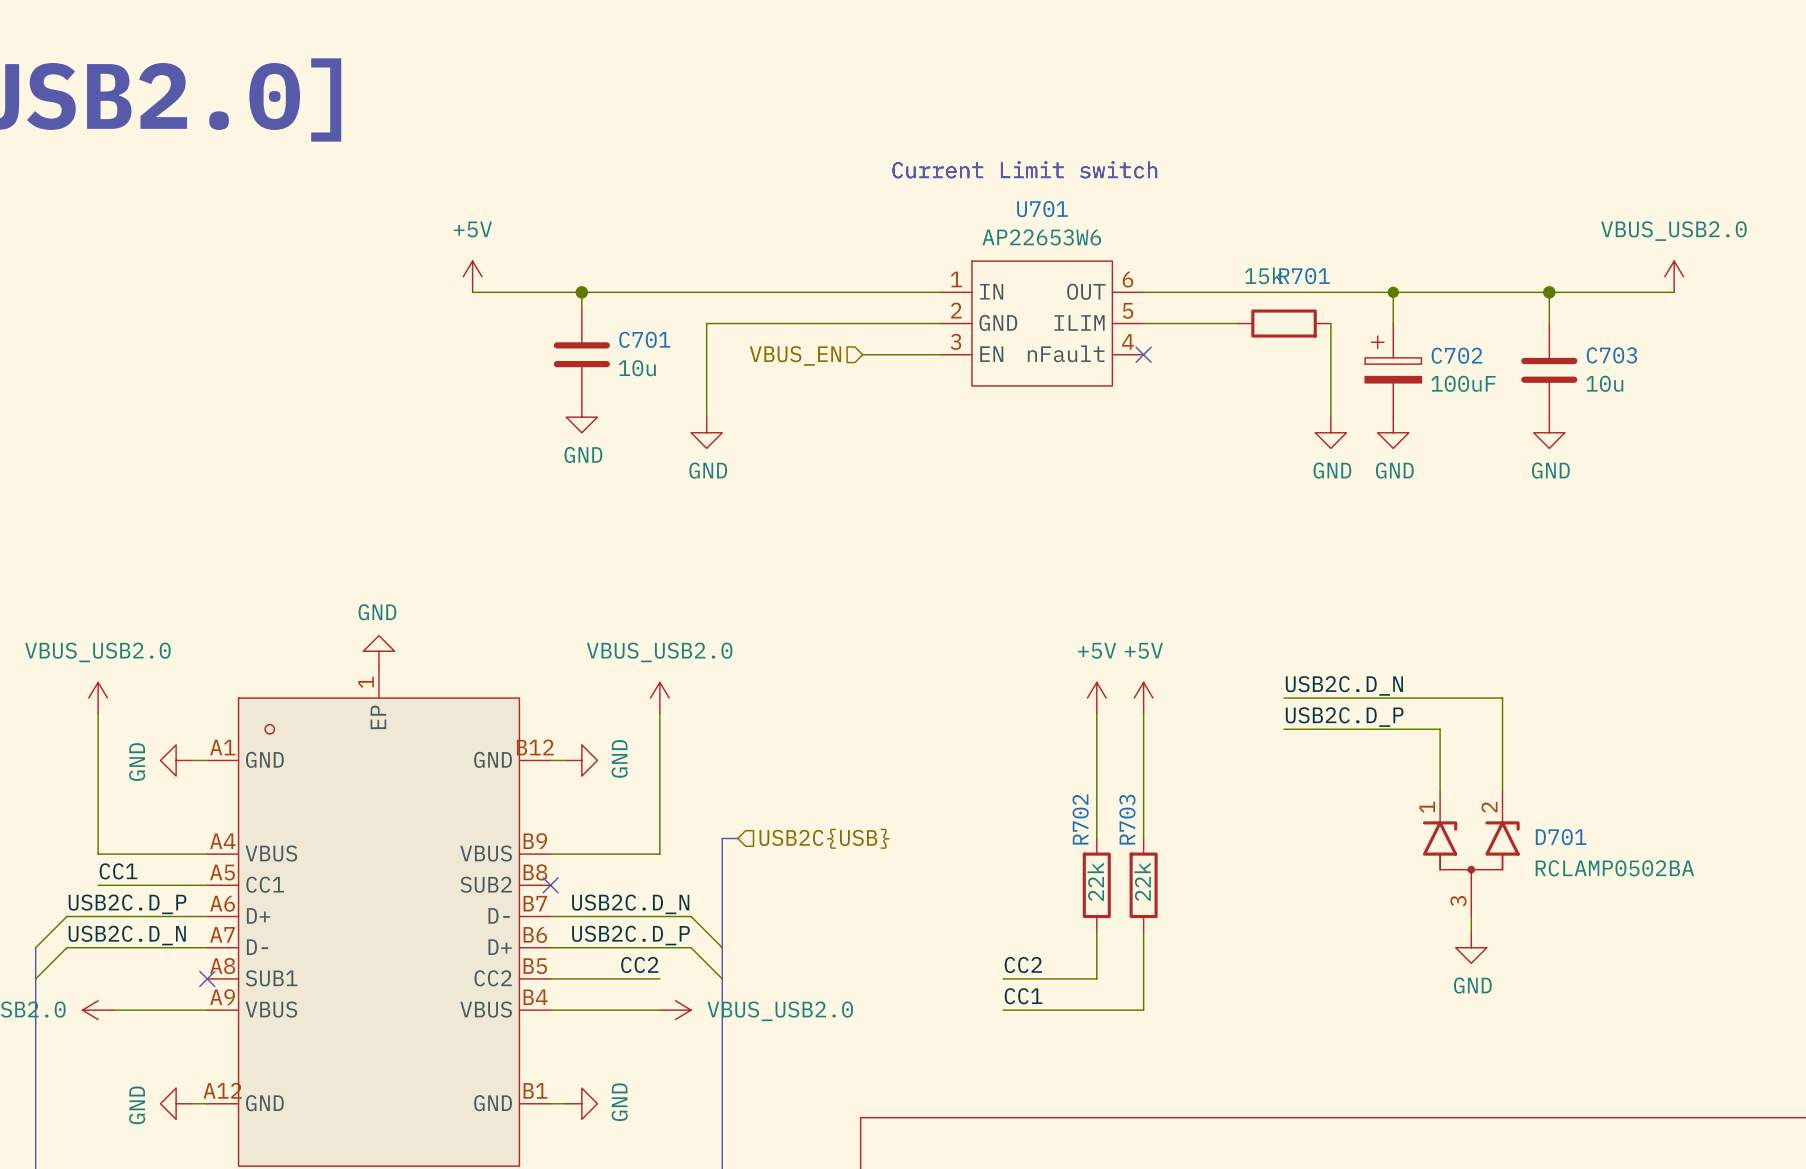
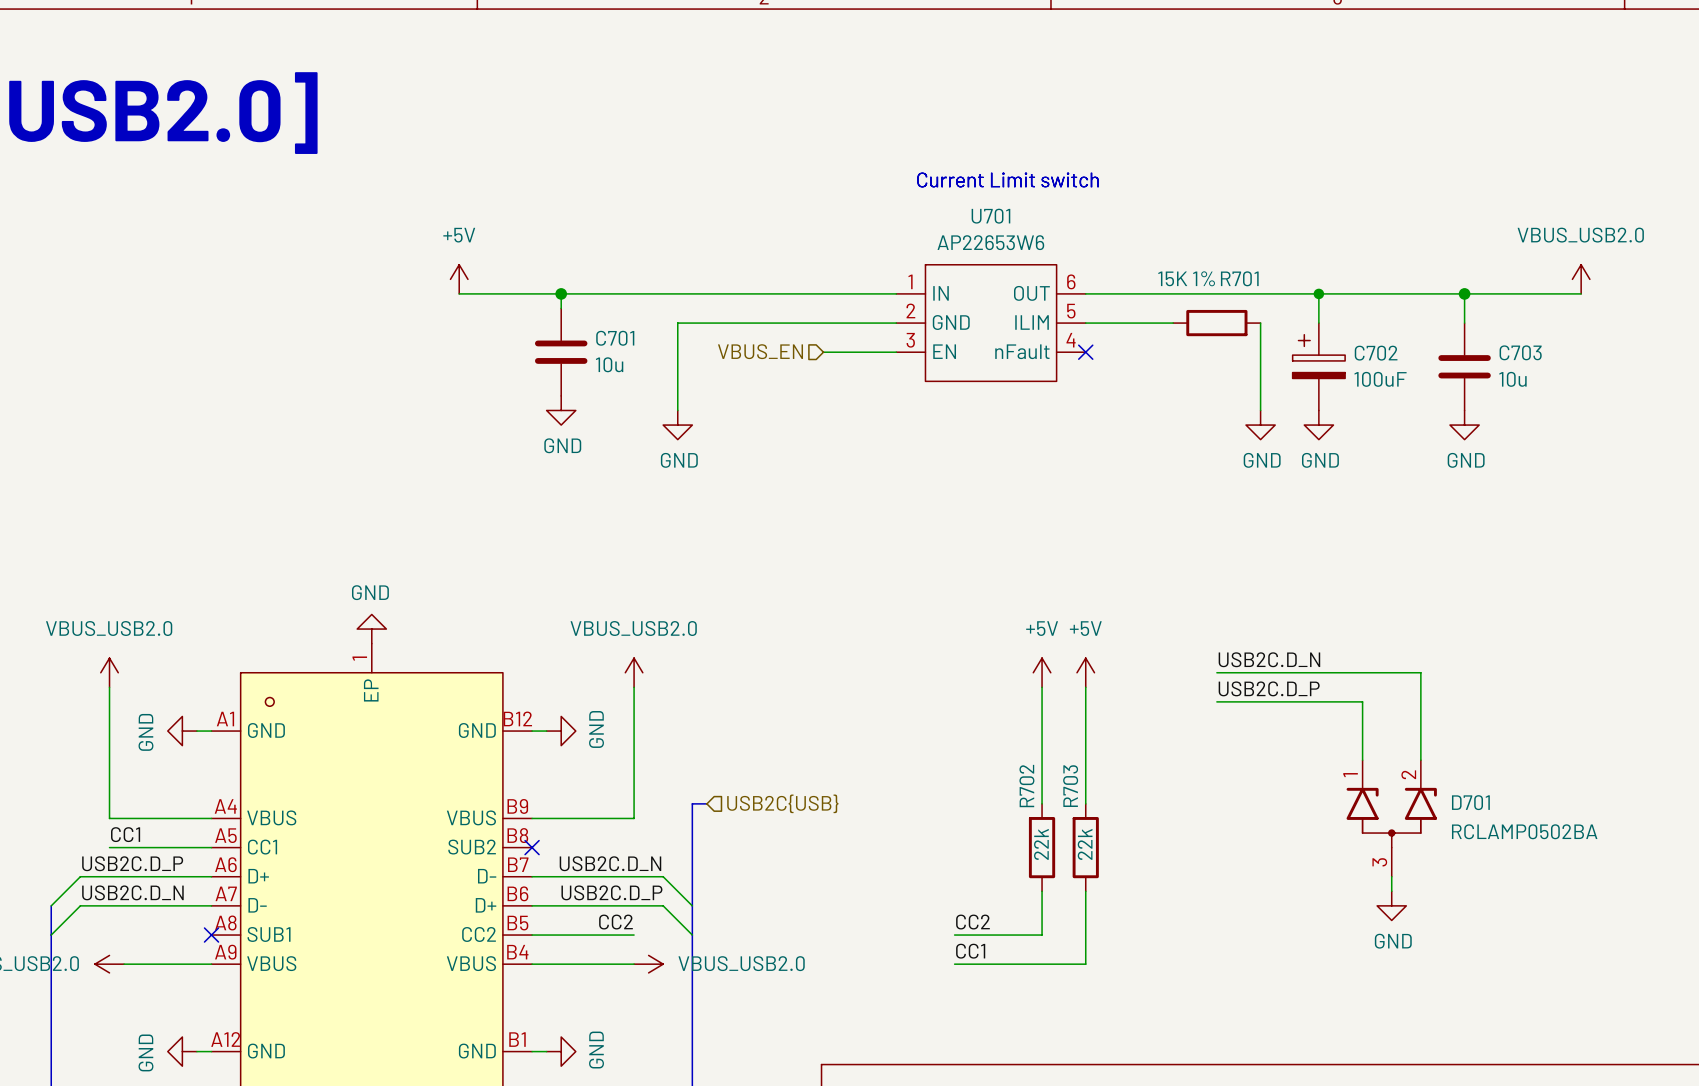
R701 value: 15k (1264, 275) -> 15K 1% (1186, 278)

